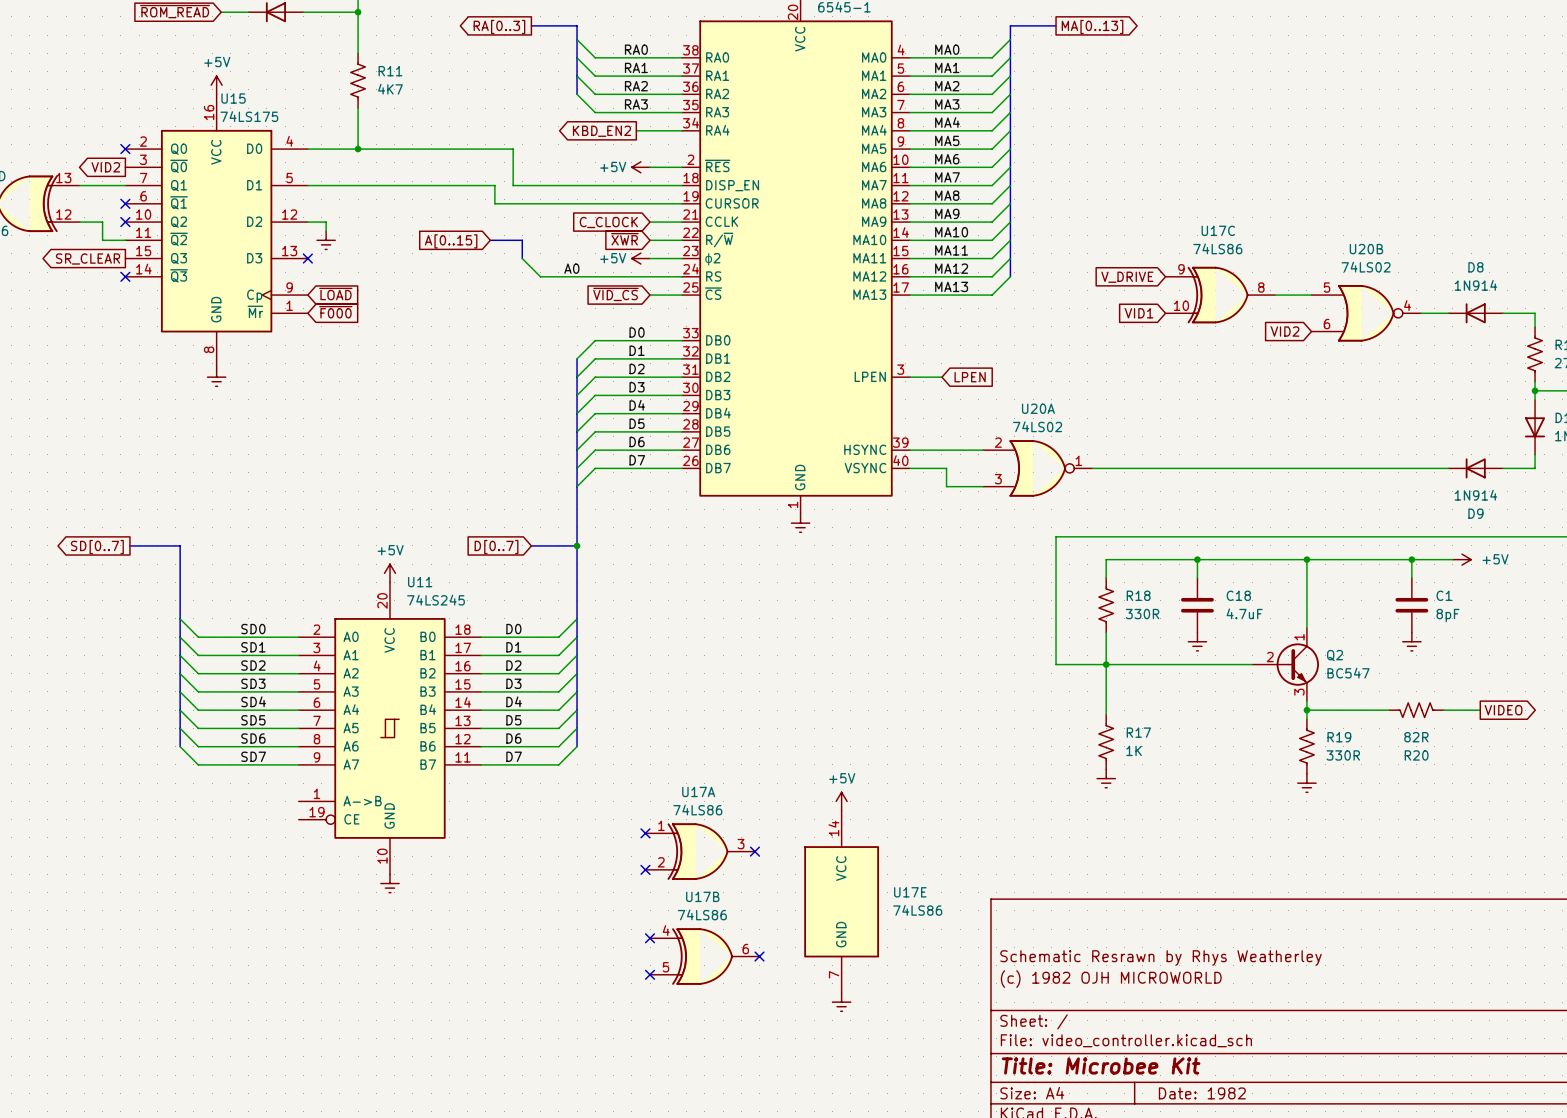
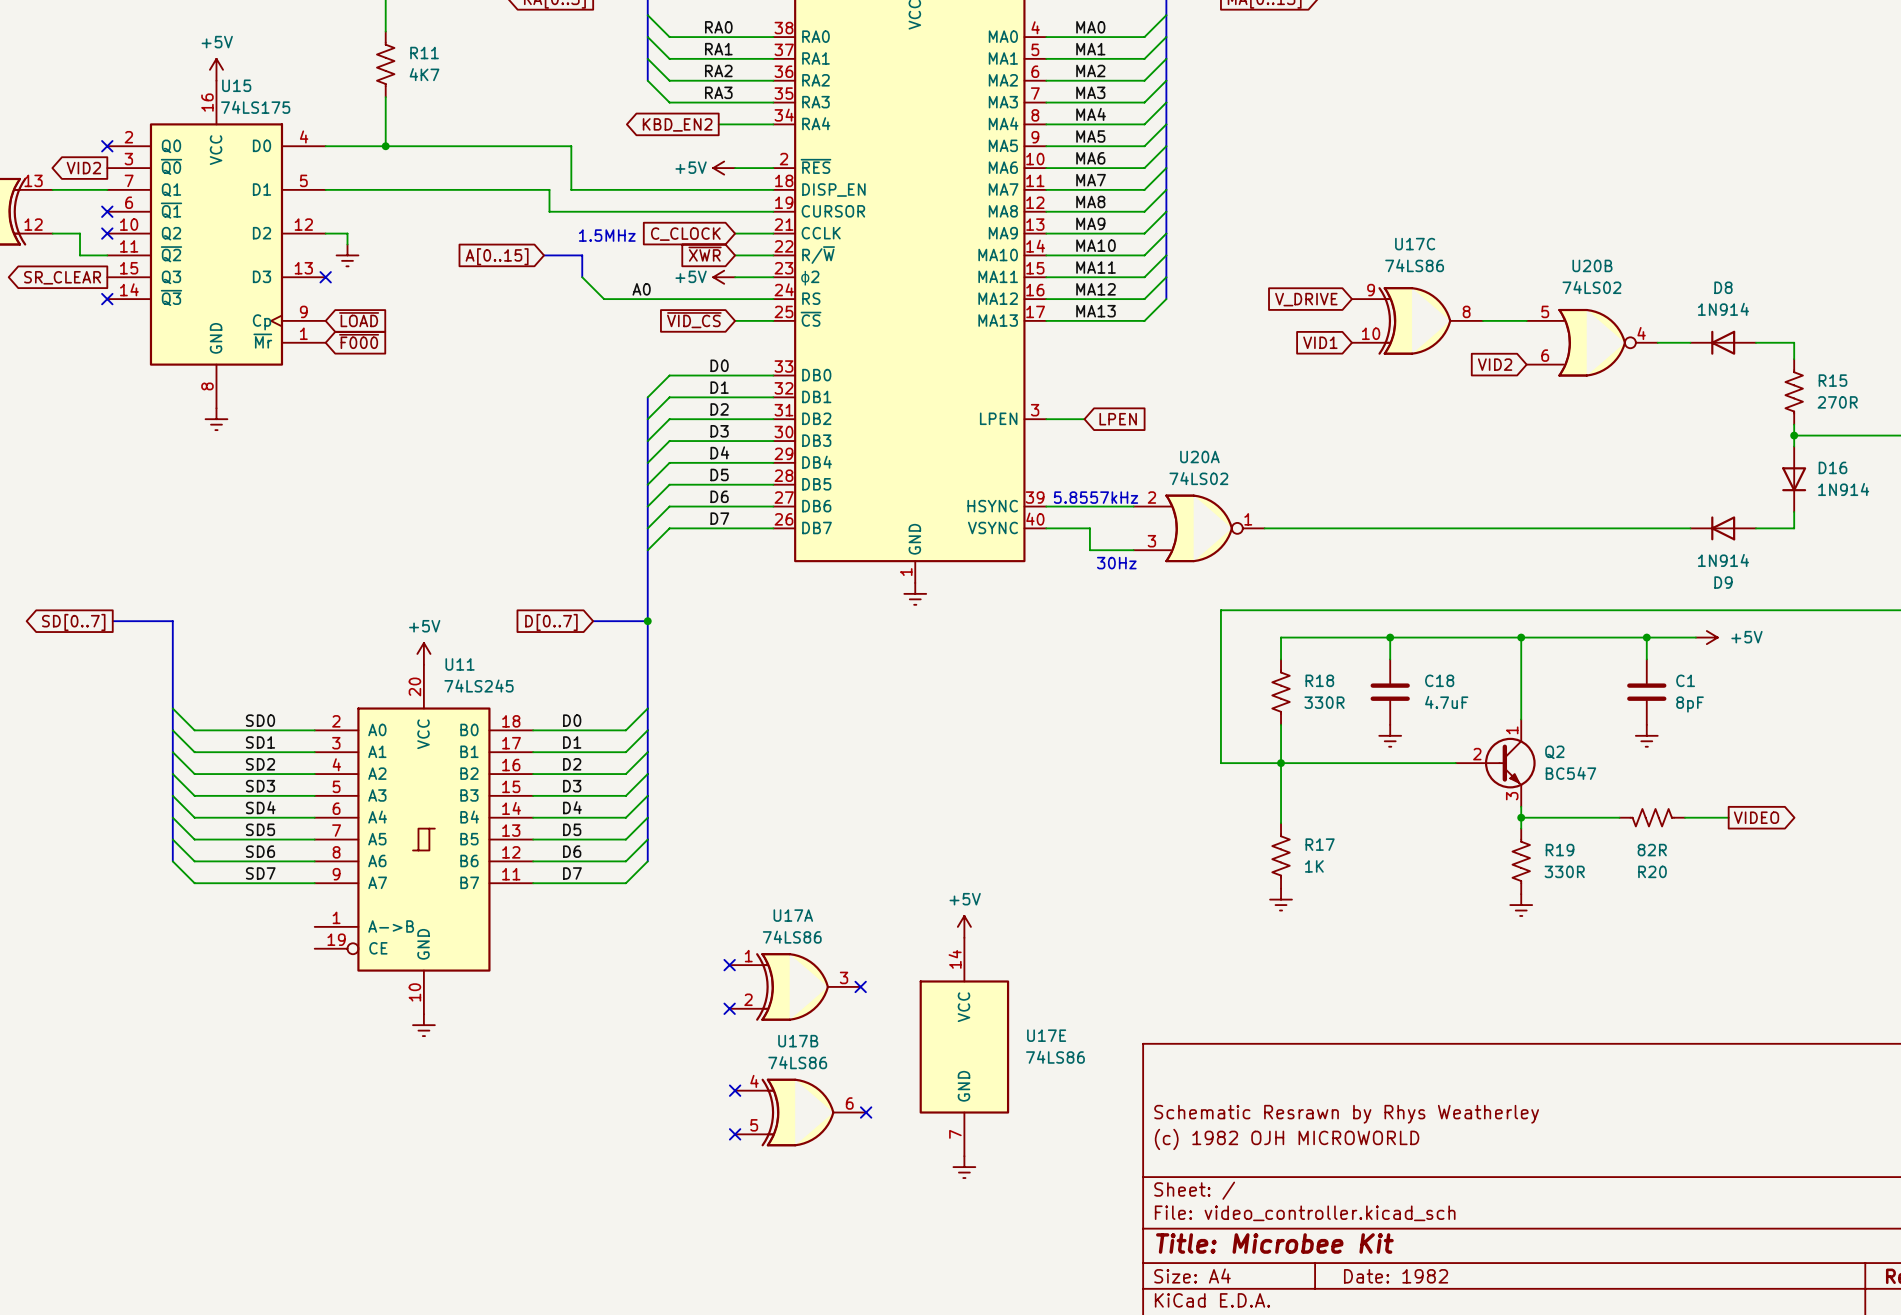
text: none -> 1.5MHz (607, 235)
text: none -> 5.8557kHz (1096, 497)
text: none -> 30Hz (1116, 563)

